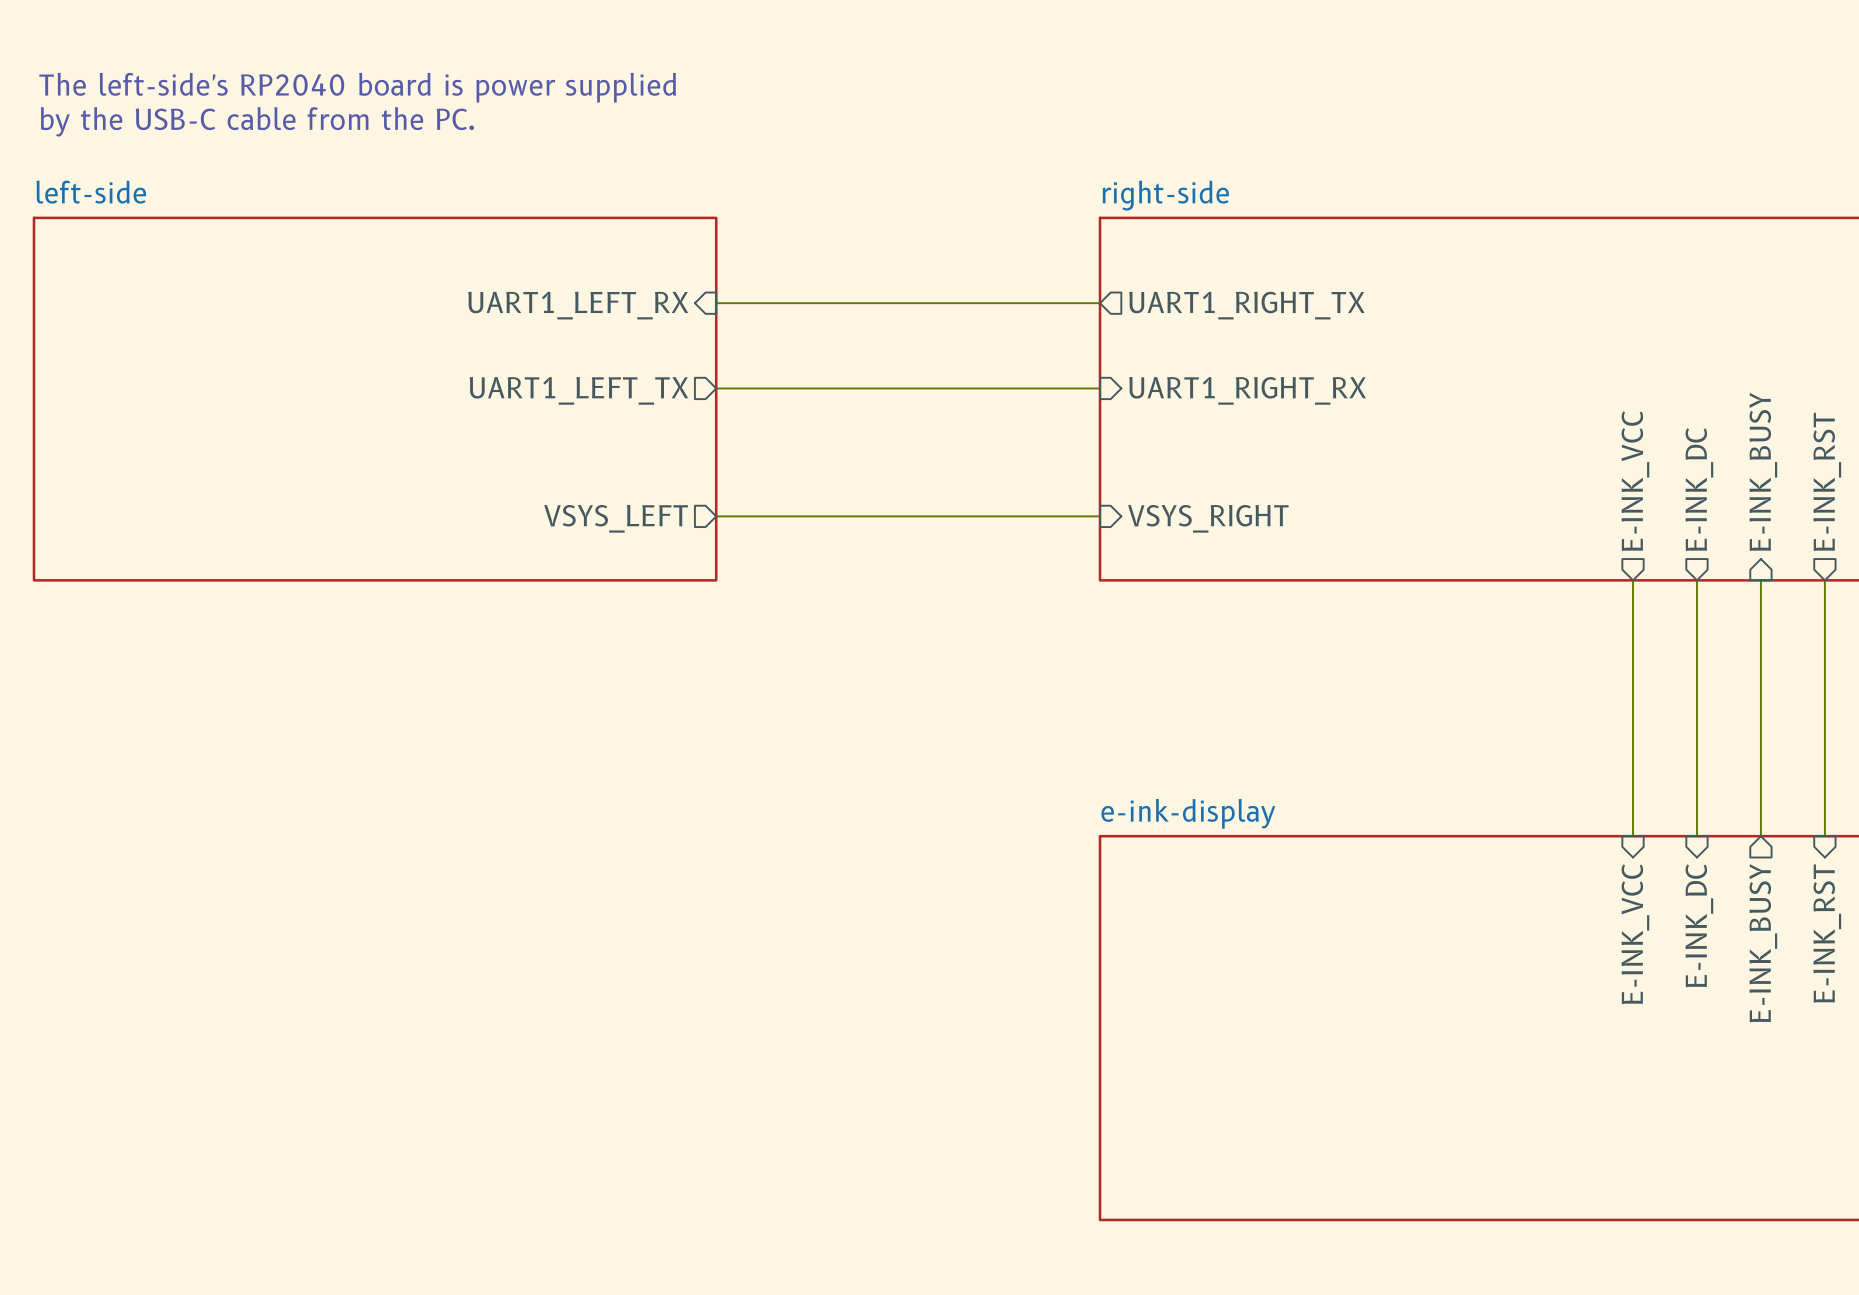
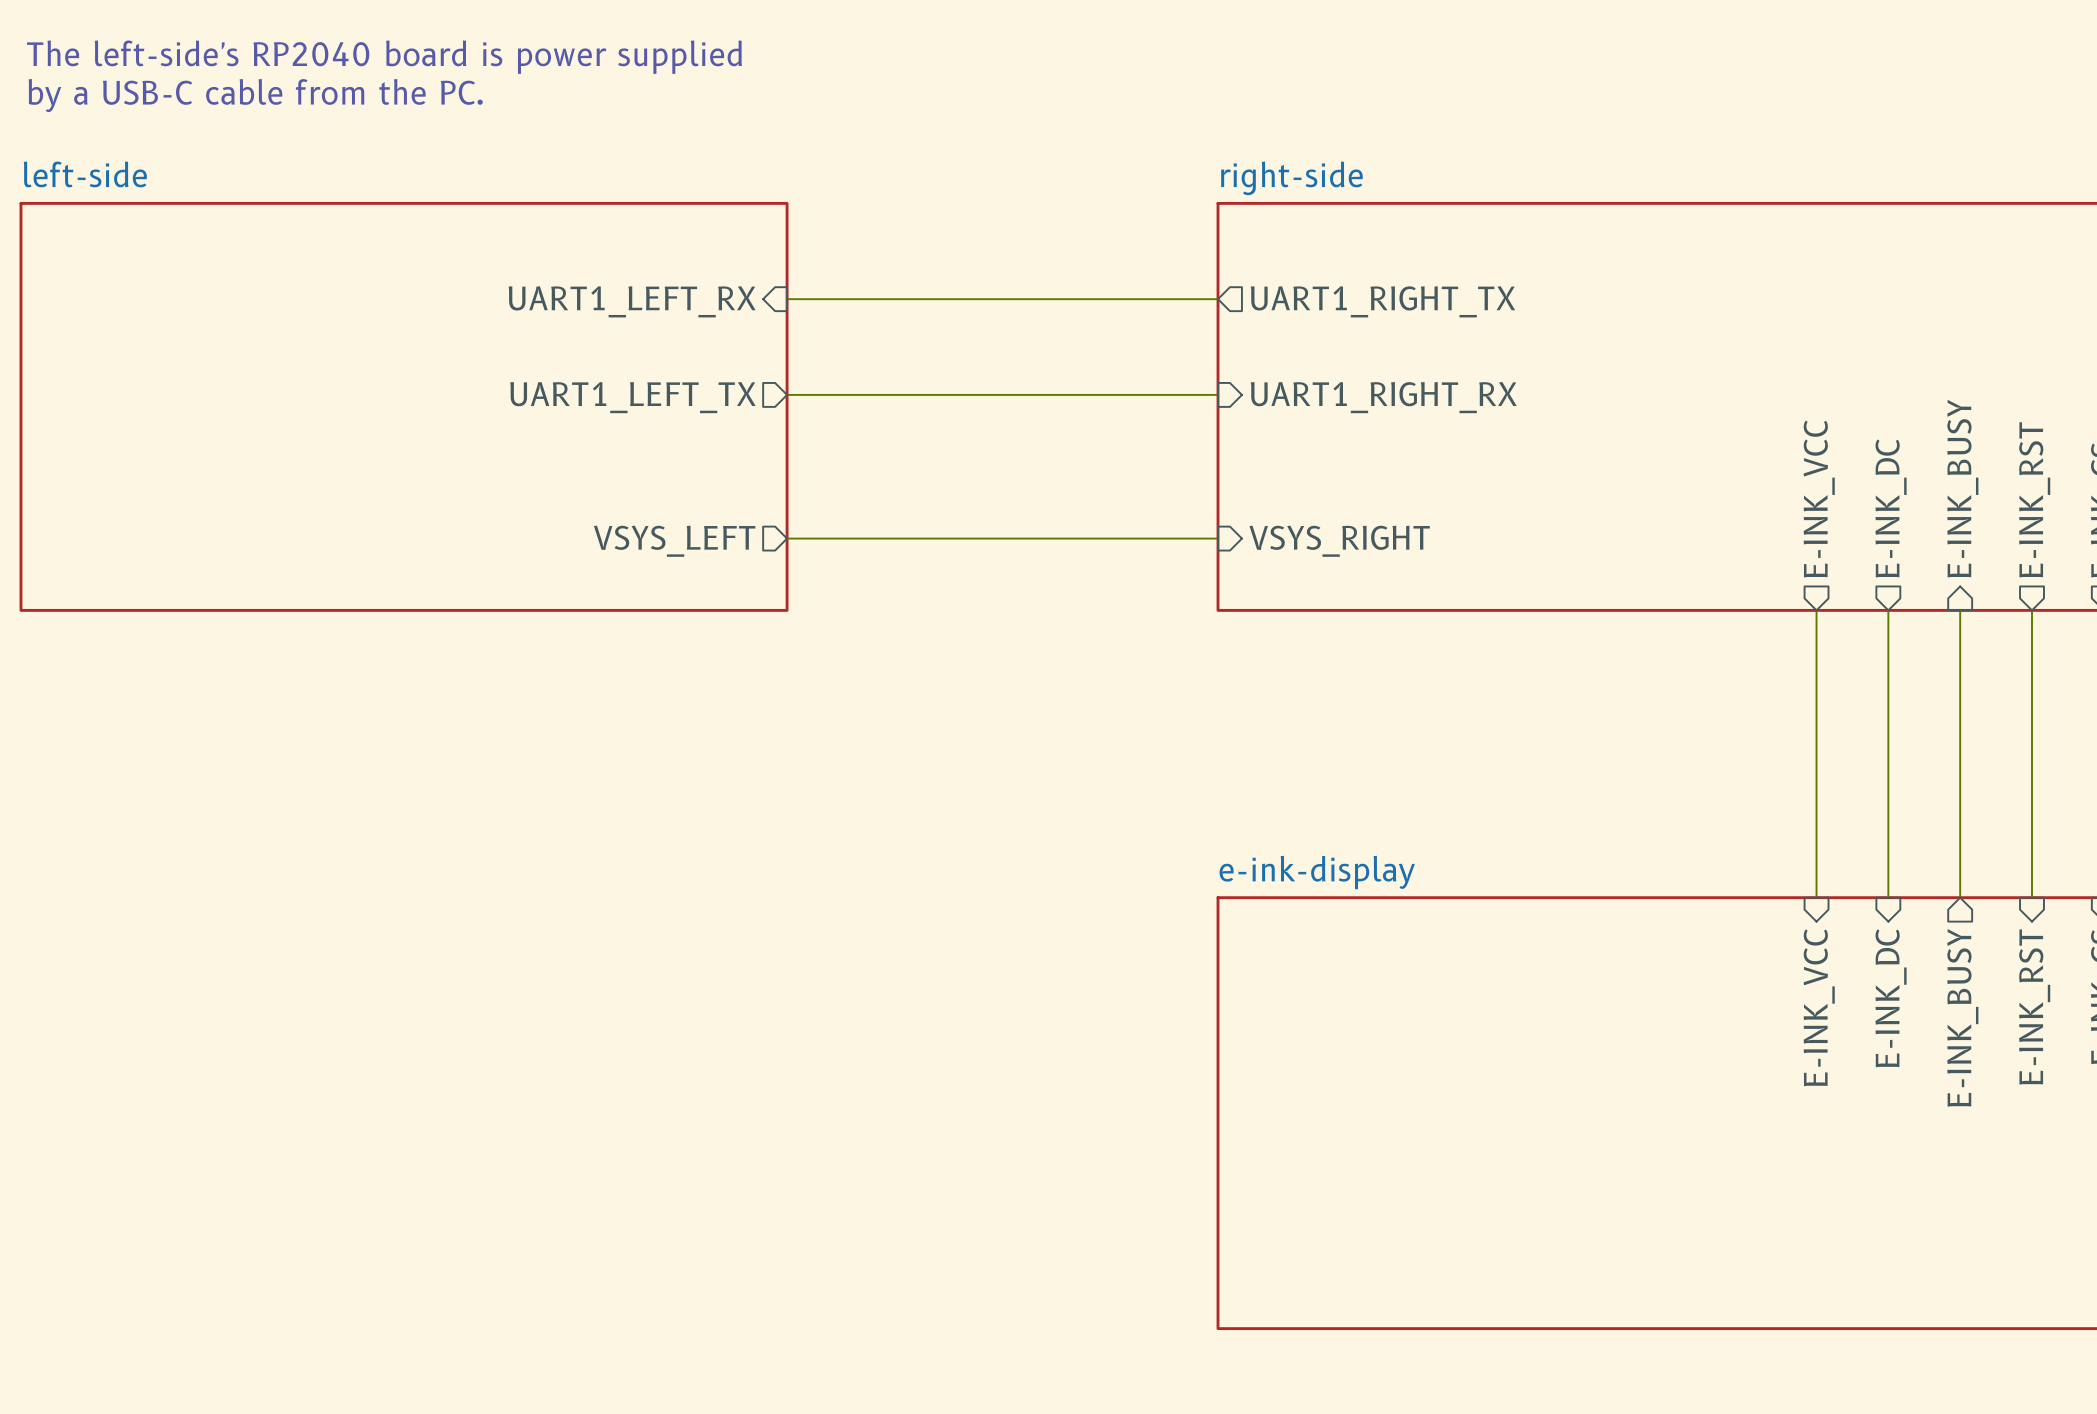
text: by the USB-C cable from the PC. (257, 121) -> by a USB-C cable from the PC. (255, 95)

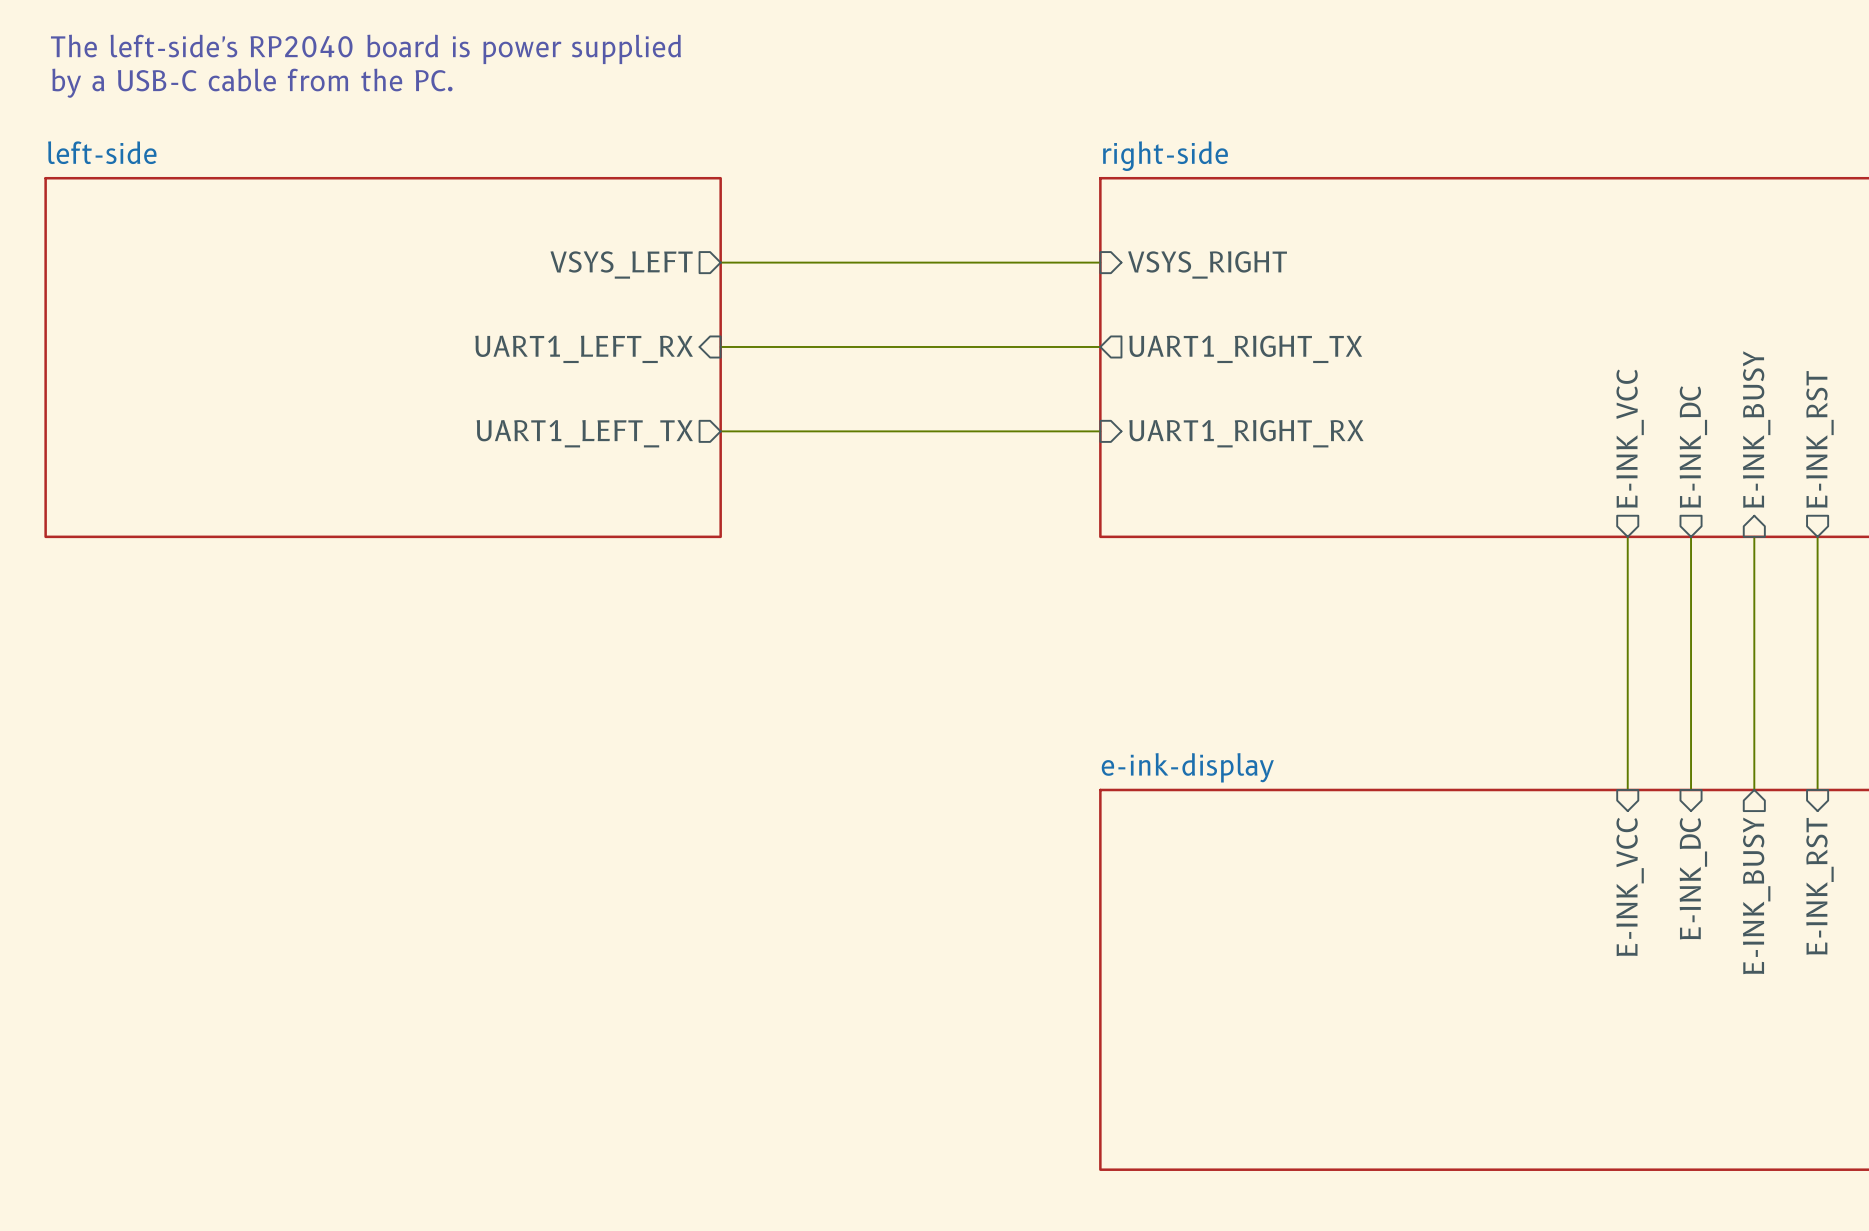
sheet pin shape: input (632, 301) -> output (621, 264)
sheet pin: UART1_LEFT_RX (632, 301) -> VSYS_LEFT (621, 264)
sheet pin shape: output (1382, 301) -> input (1207, 264)
sheet pin: UART1_RIGHT_TX (1382, 301) -> VSYS_RIGHT (1207, 264)
sheet pin shape: output (632, 397) -> input (584, 349)
sheet pin: UART1_LEFT_TX (632, 397) -> UART1_LEFT_RX (584, 349)
sheet pin shape: input (1383, 397) -> output (1245, 349)
sheet pin: UART1_RIGHT_RX (1383, 397) -> UART1_RIGHT_TX (1245, 349)
sheet pin: none -> UART1_LEFT_TX (584, 433)
sheet pin: none -> UART1_RIGHT_RX (1246, 433)
wire: (787, 538) (1218, 538) -> (720, 431) (1100, 431)
sheet pin: VSYS_LEFT (674, 541) -> none
sheet pin: VSYS_RIGHT (1339, 541) -> none

